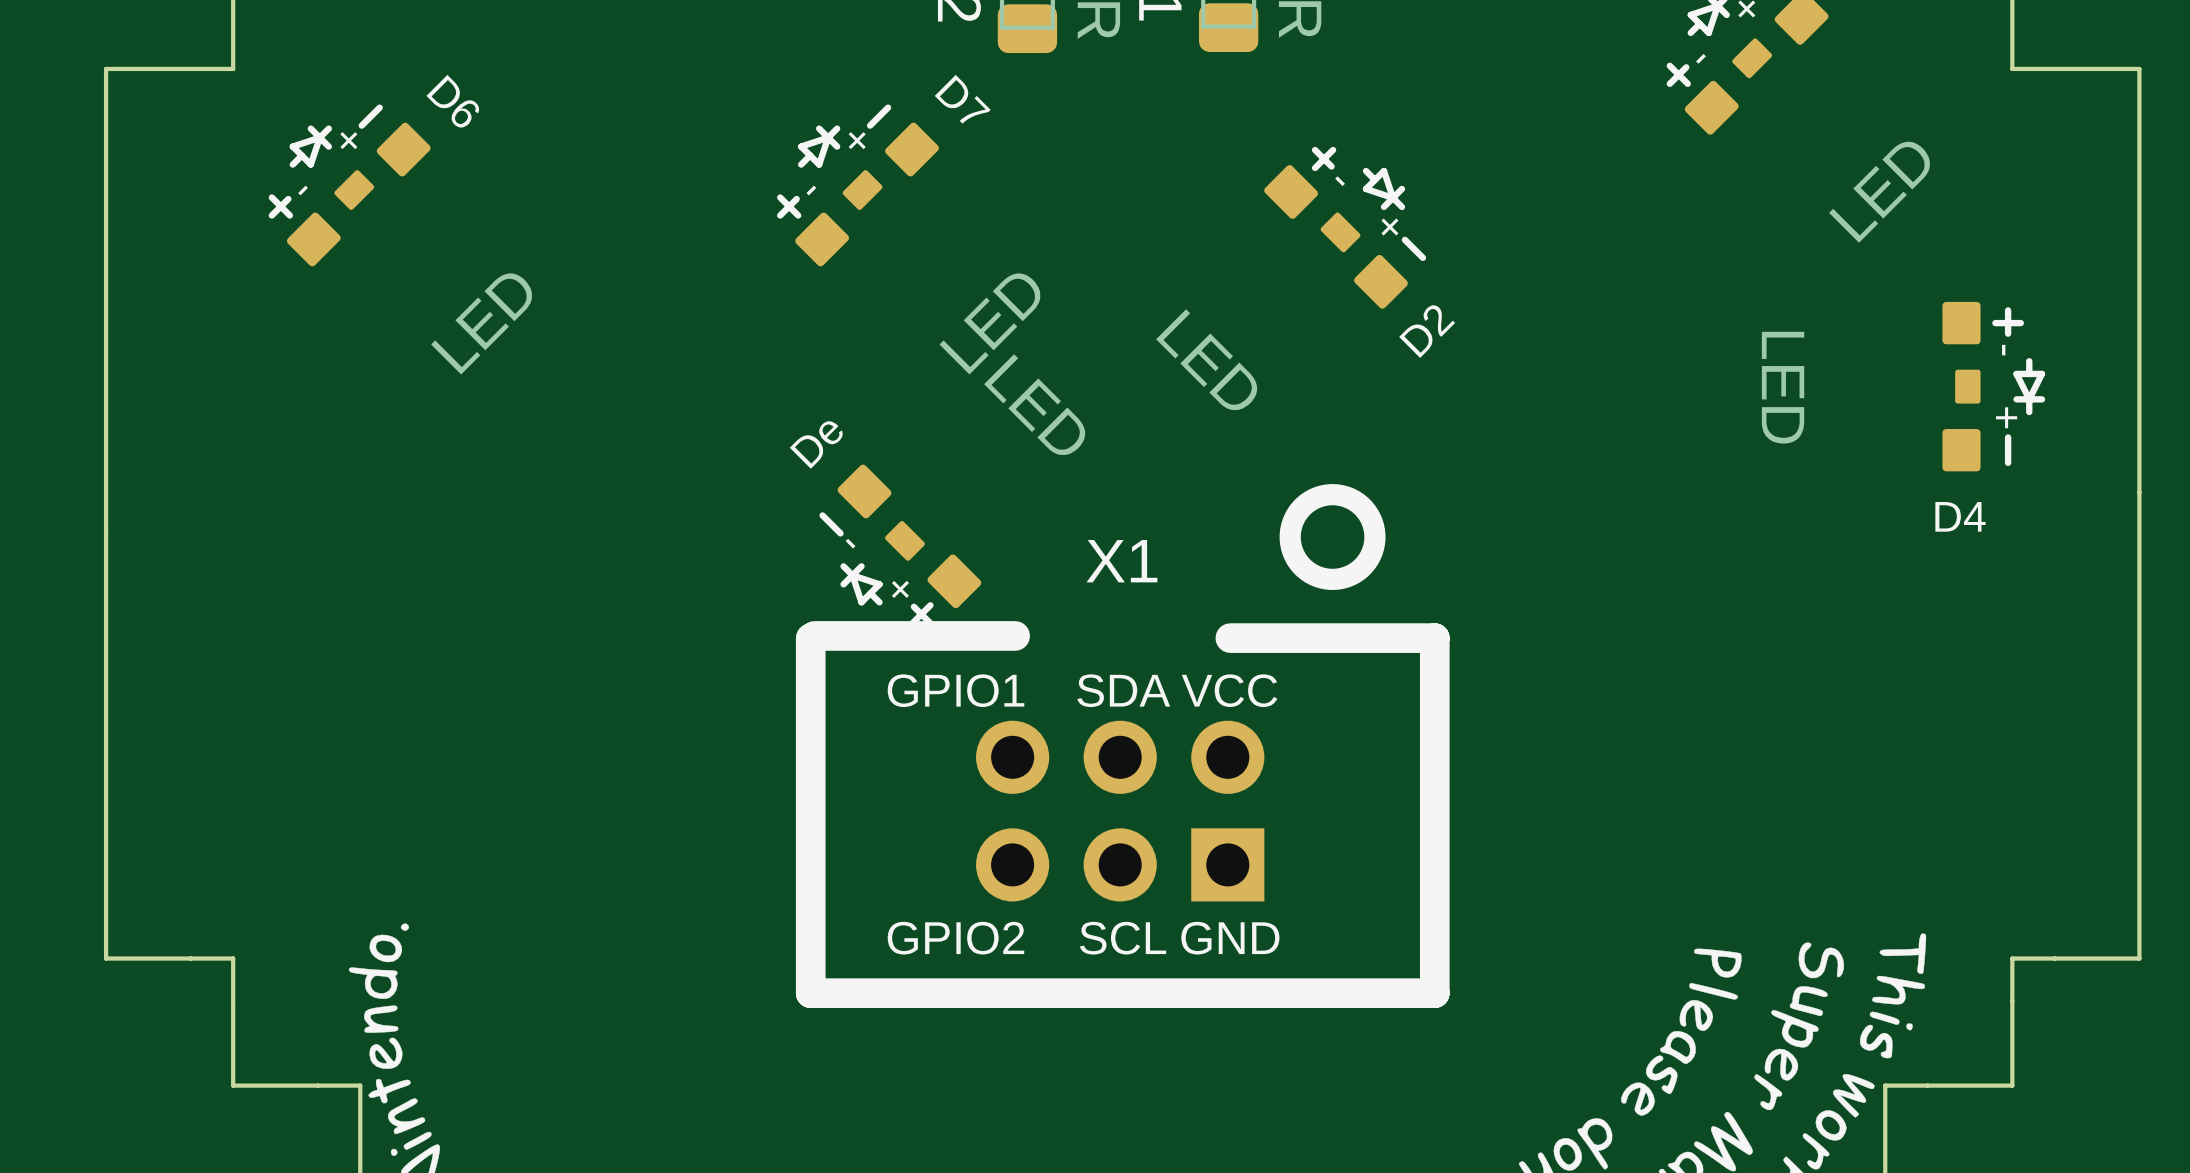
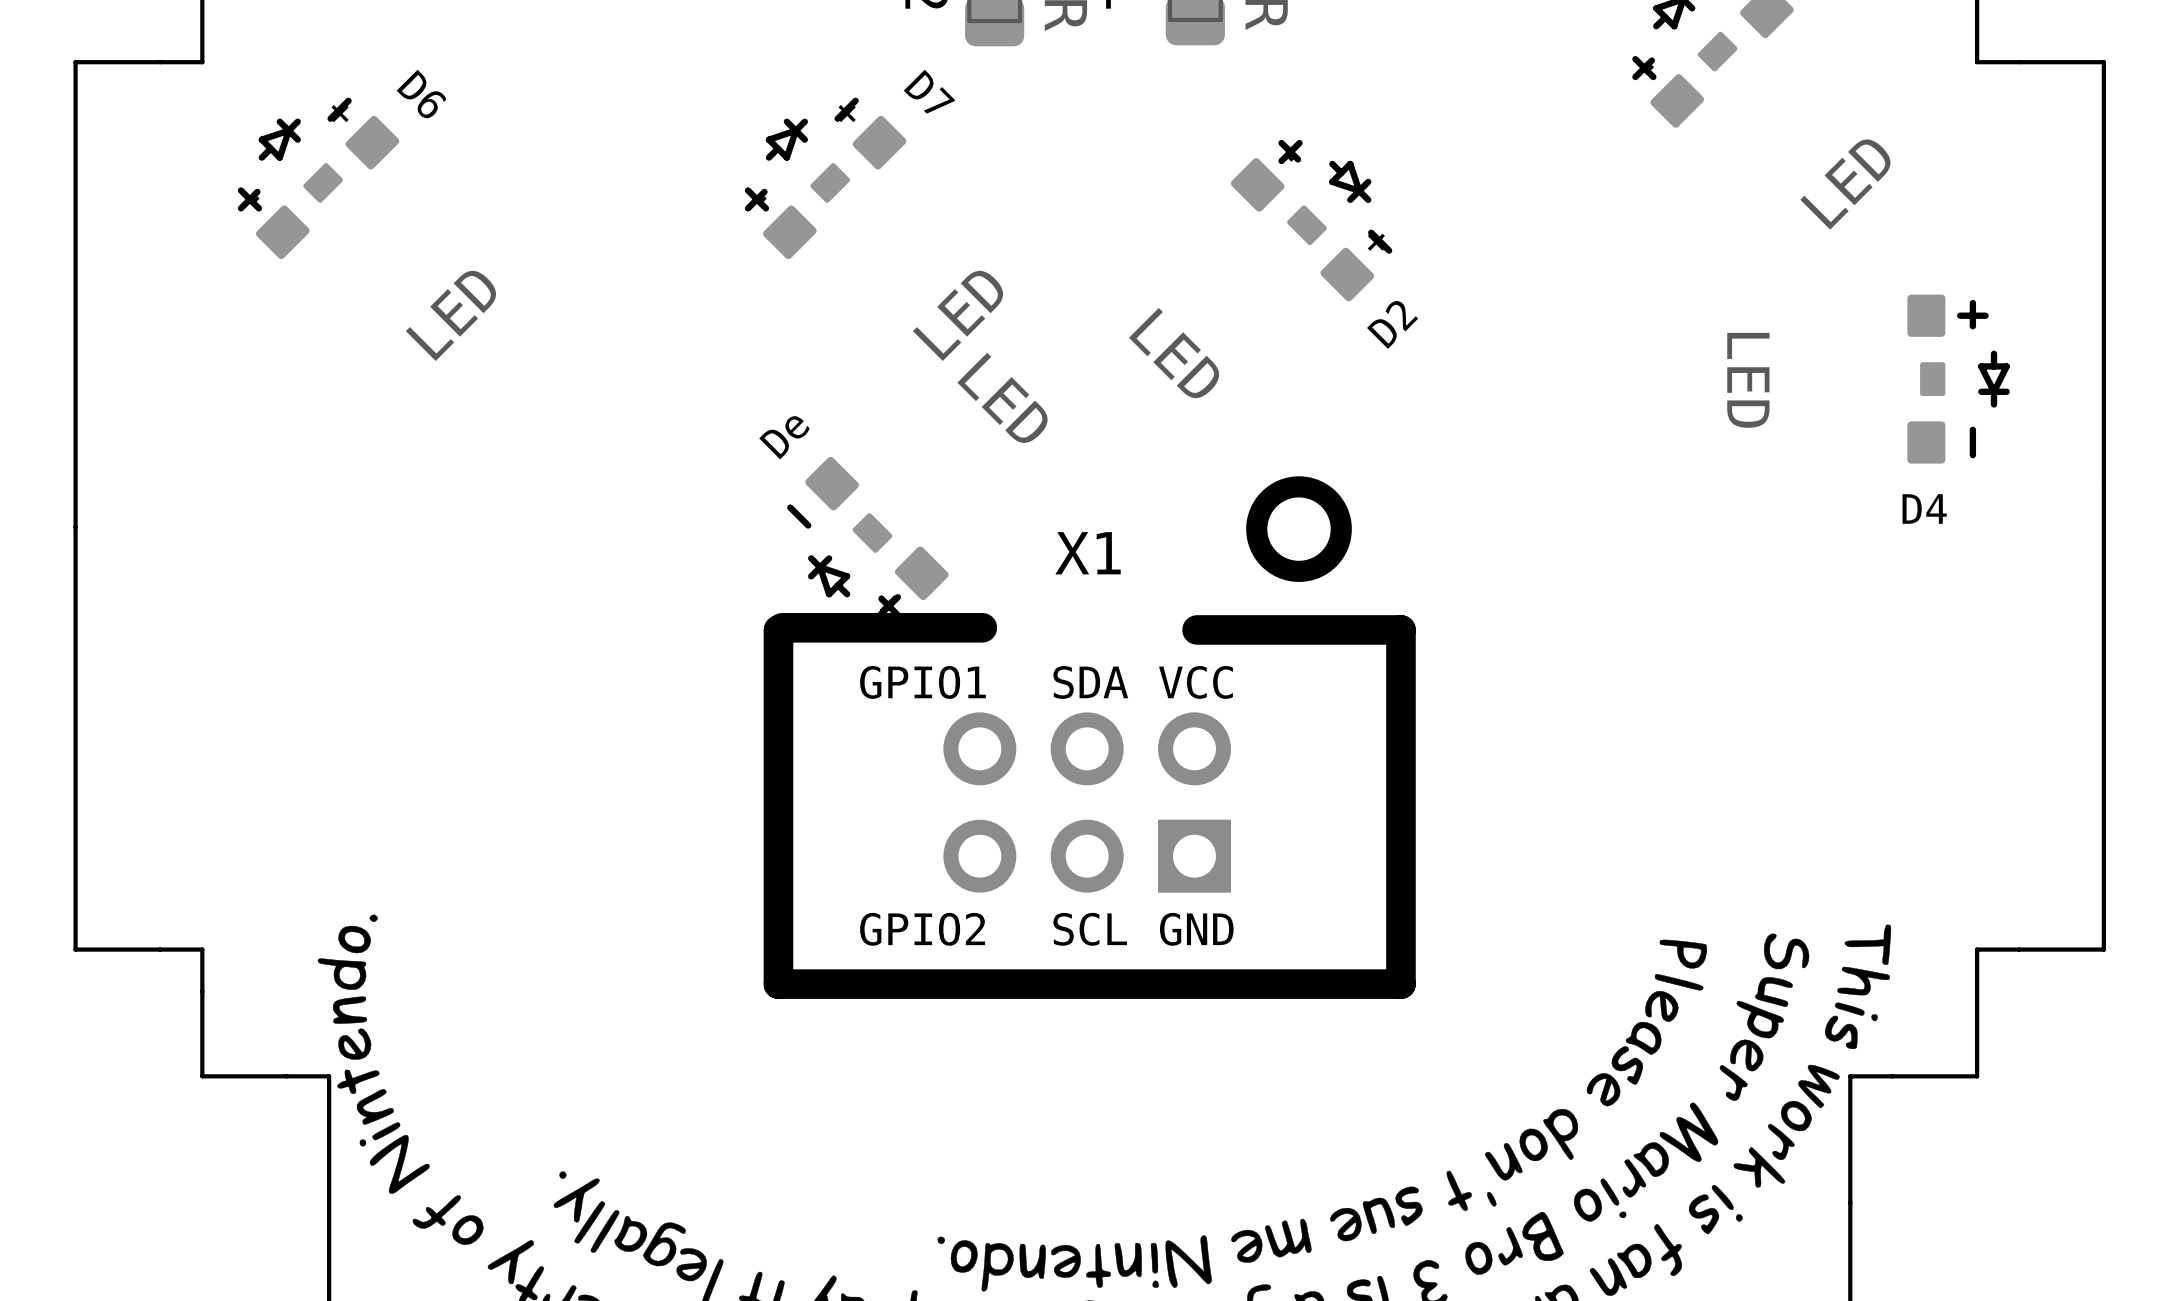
D4 text: - + (2006, 386) -> none

